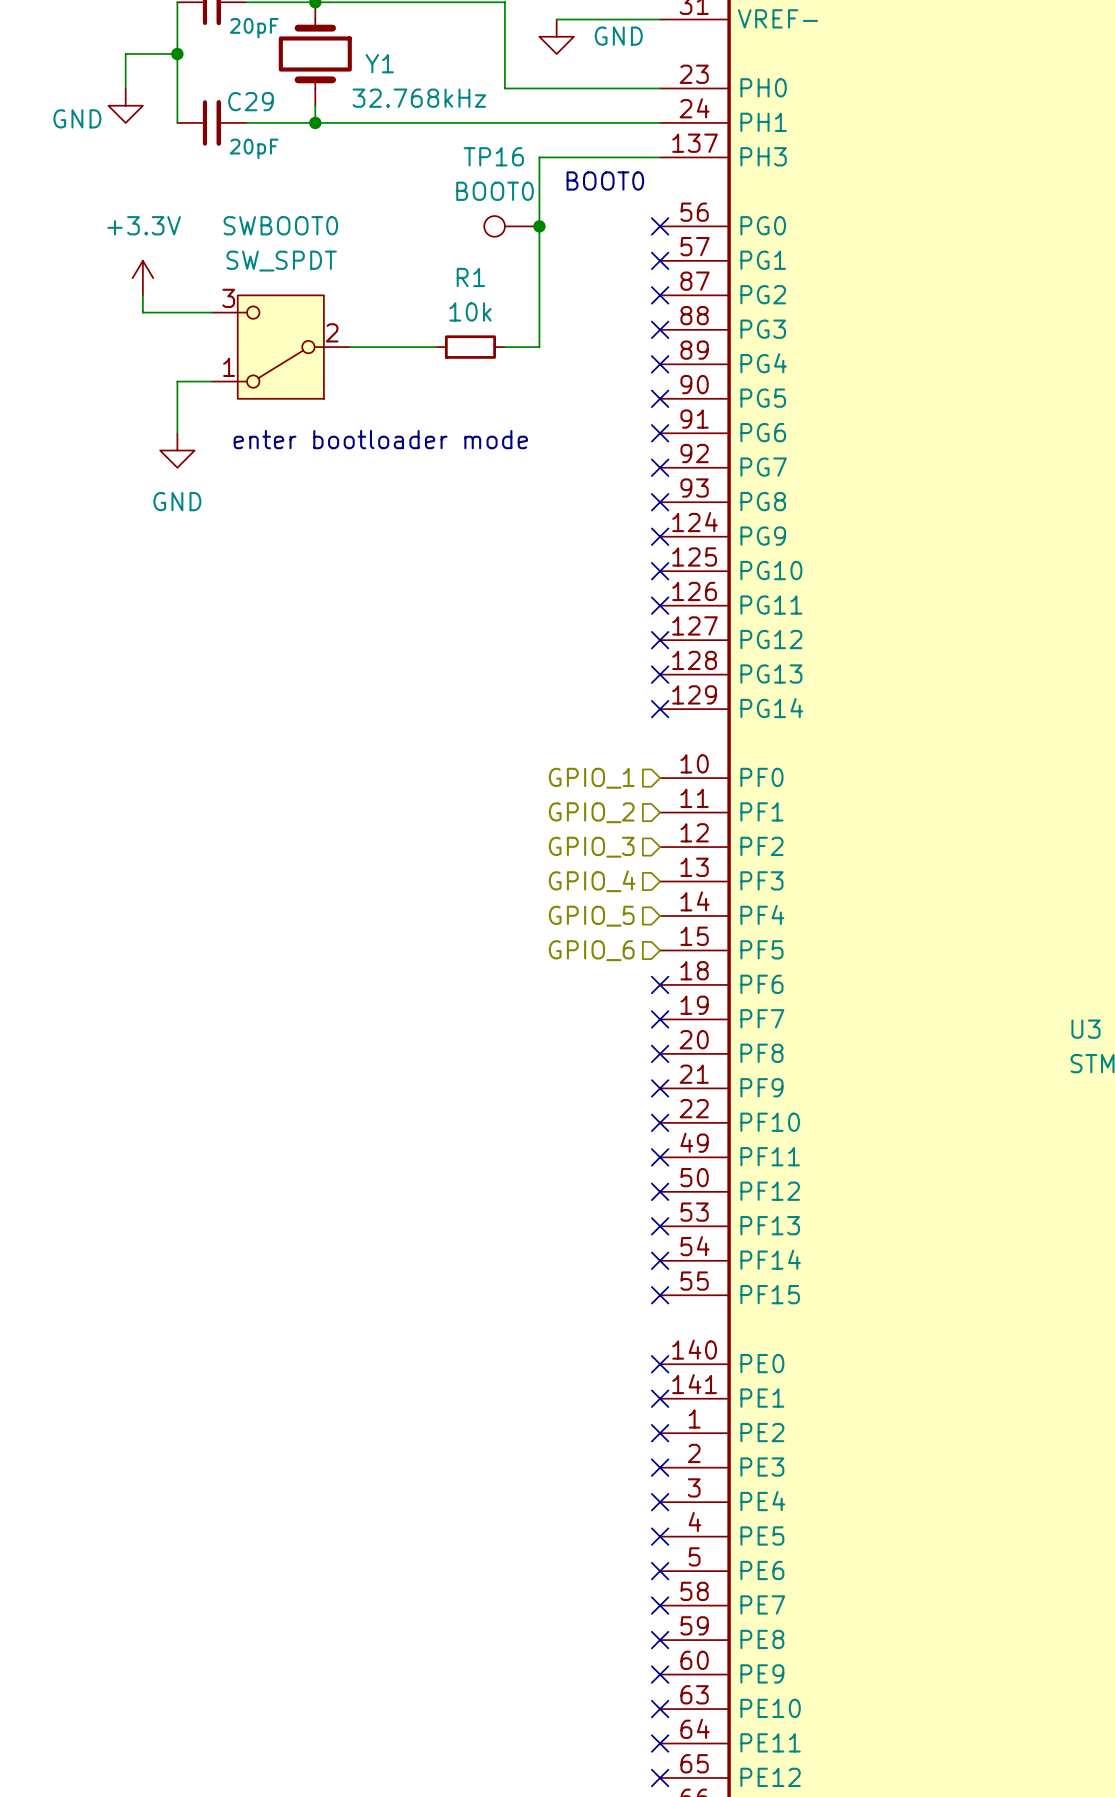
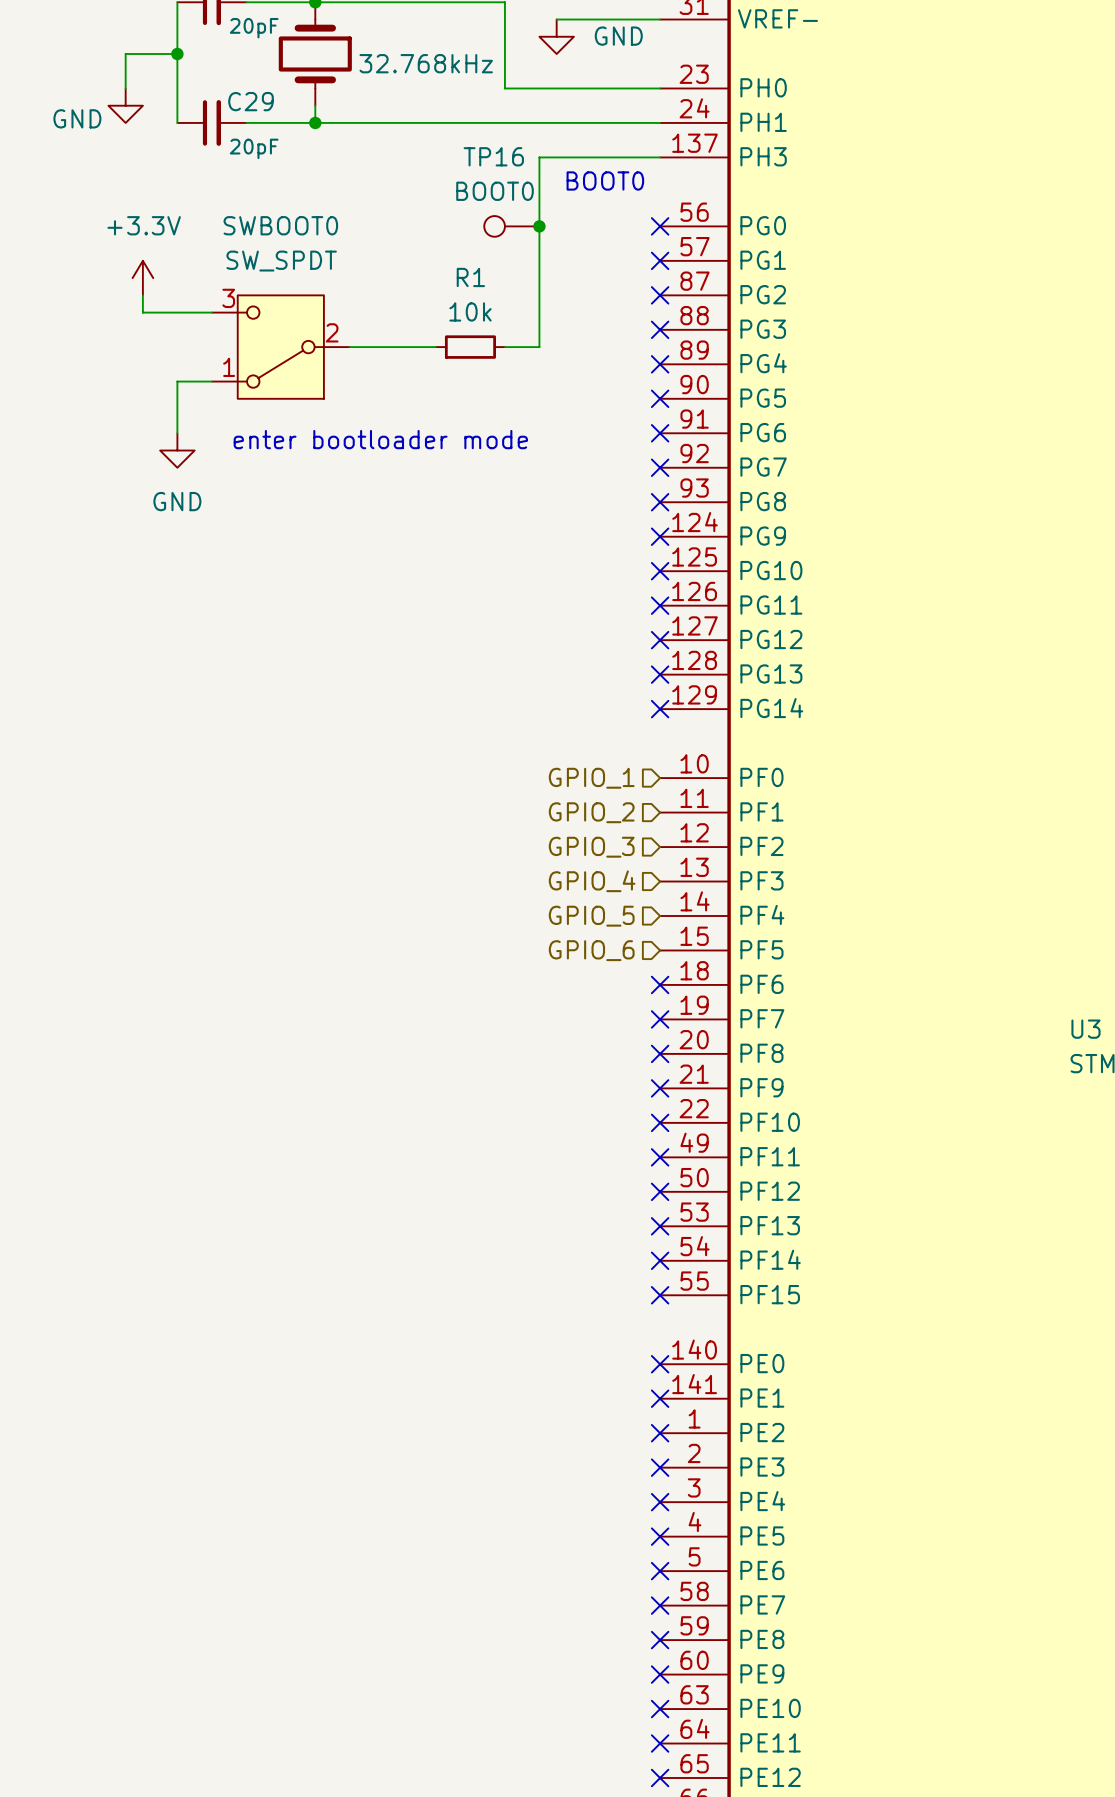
Y1 name: Y1 (379, 63) -> none
Y1 value position: 32.768kHz (419, 98) -> 32.768kHz (426, 63)

